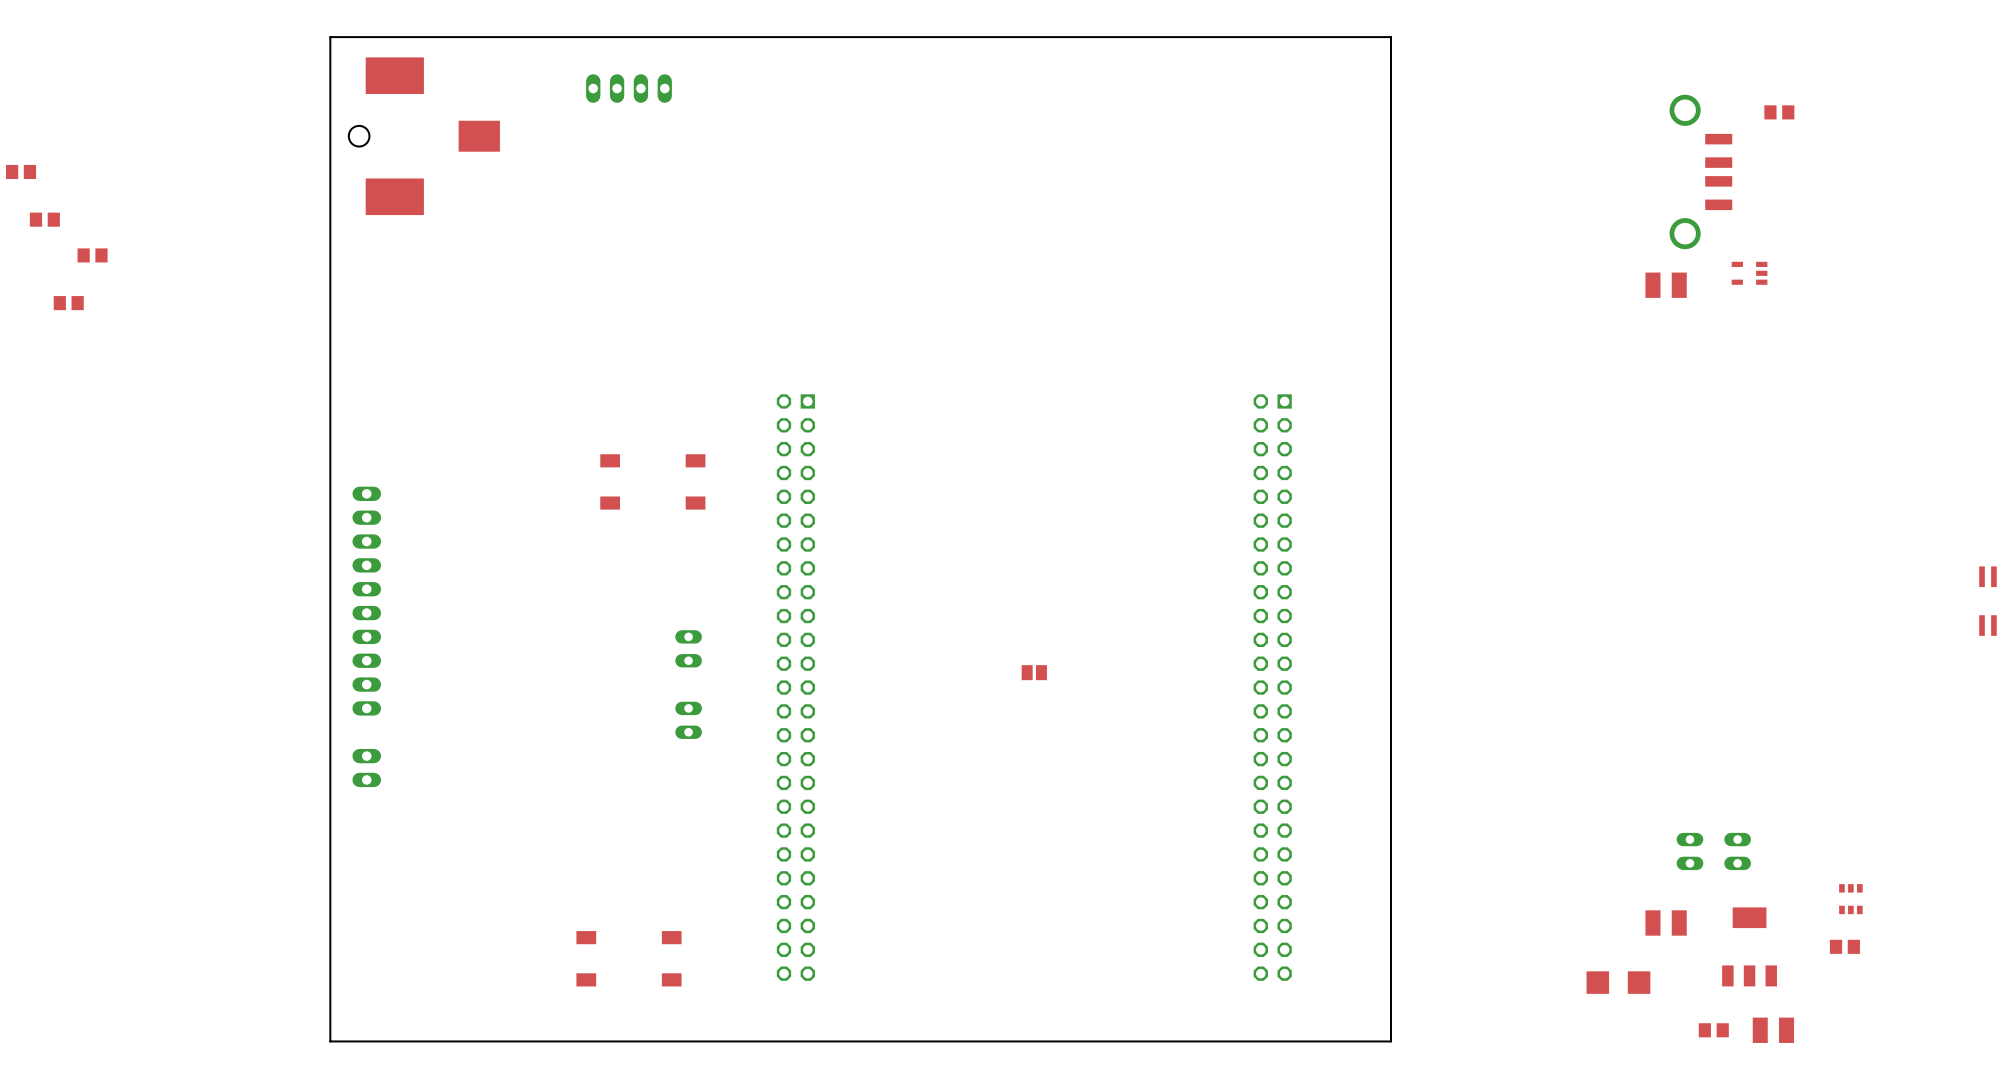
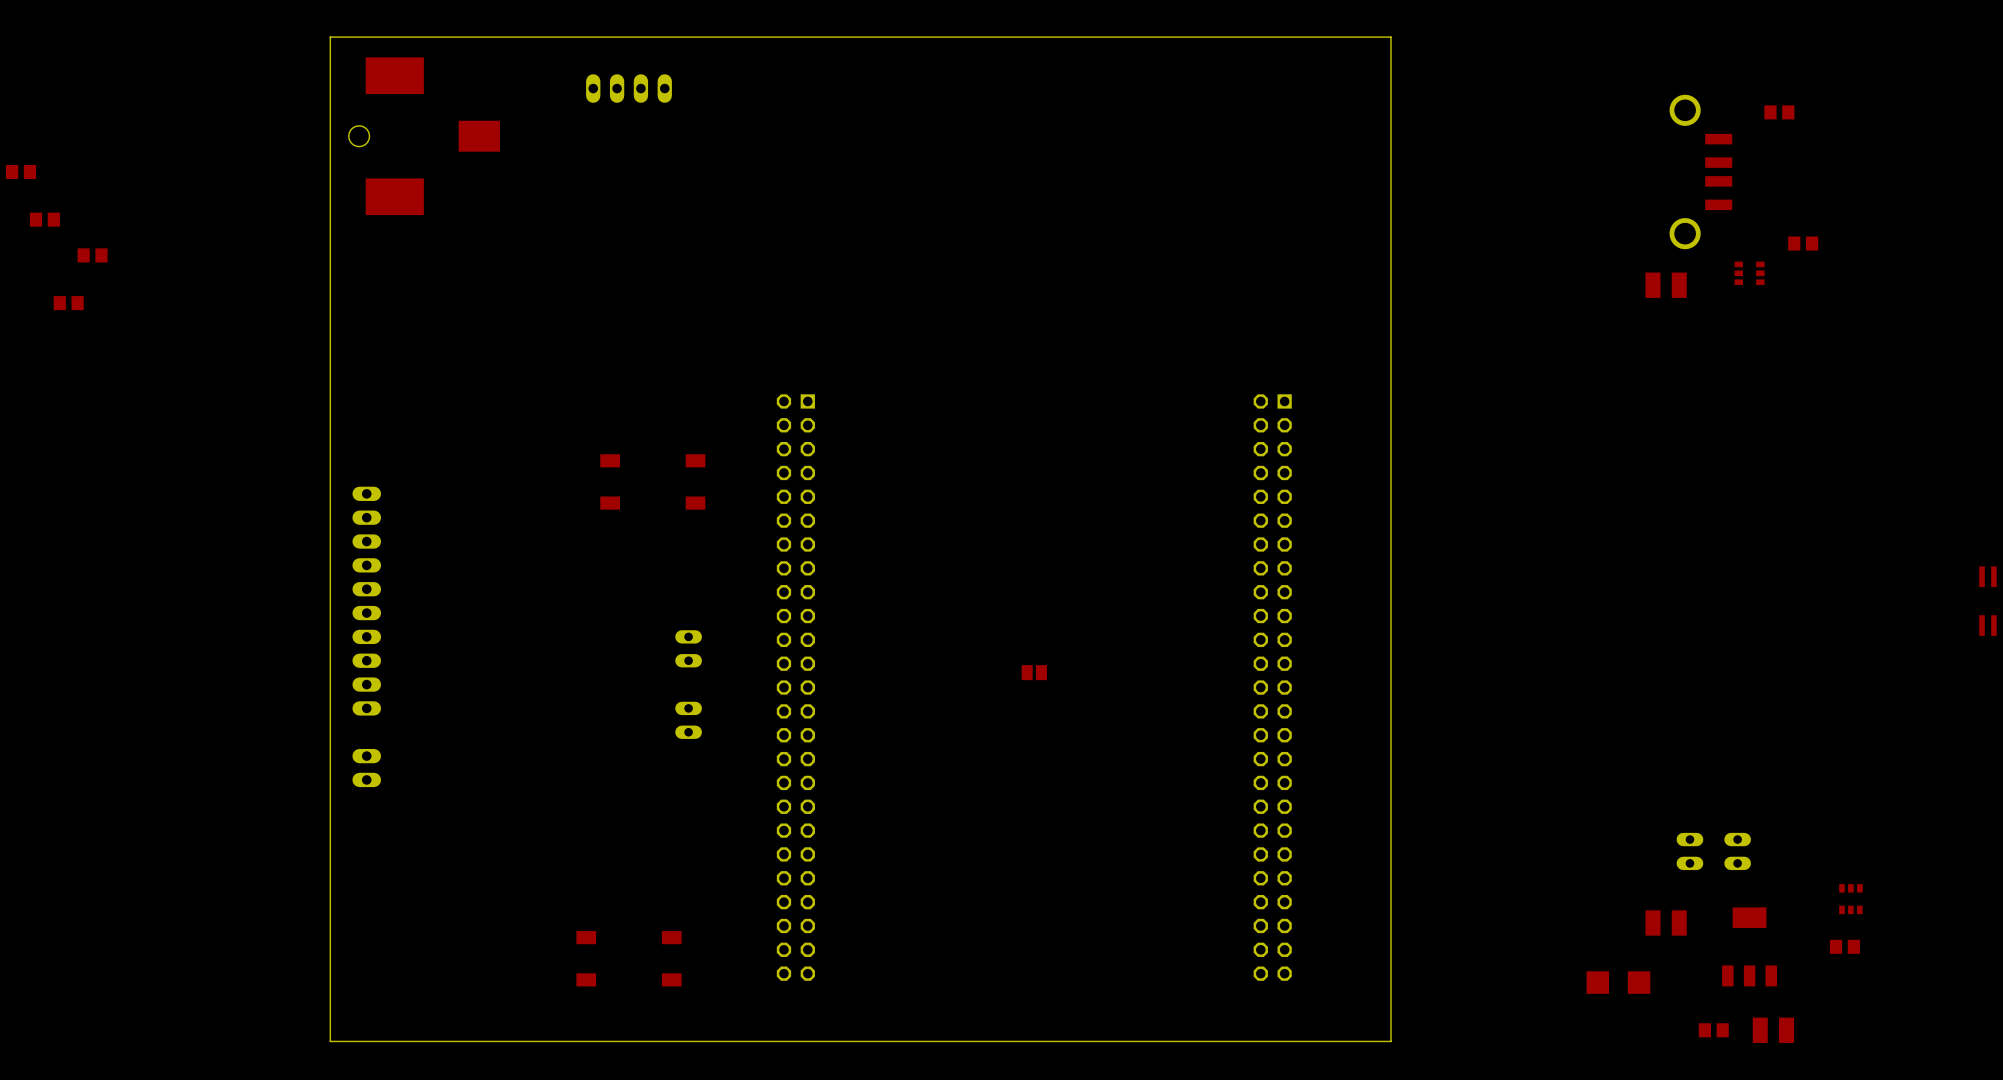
part: none -> (1803, 243)
part footprint: [1731, 261, 1768, 285] -> [1734, 261, 1765, 286]

